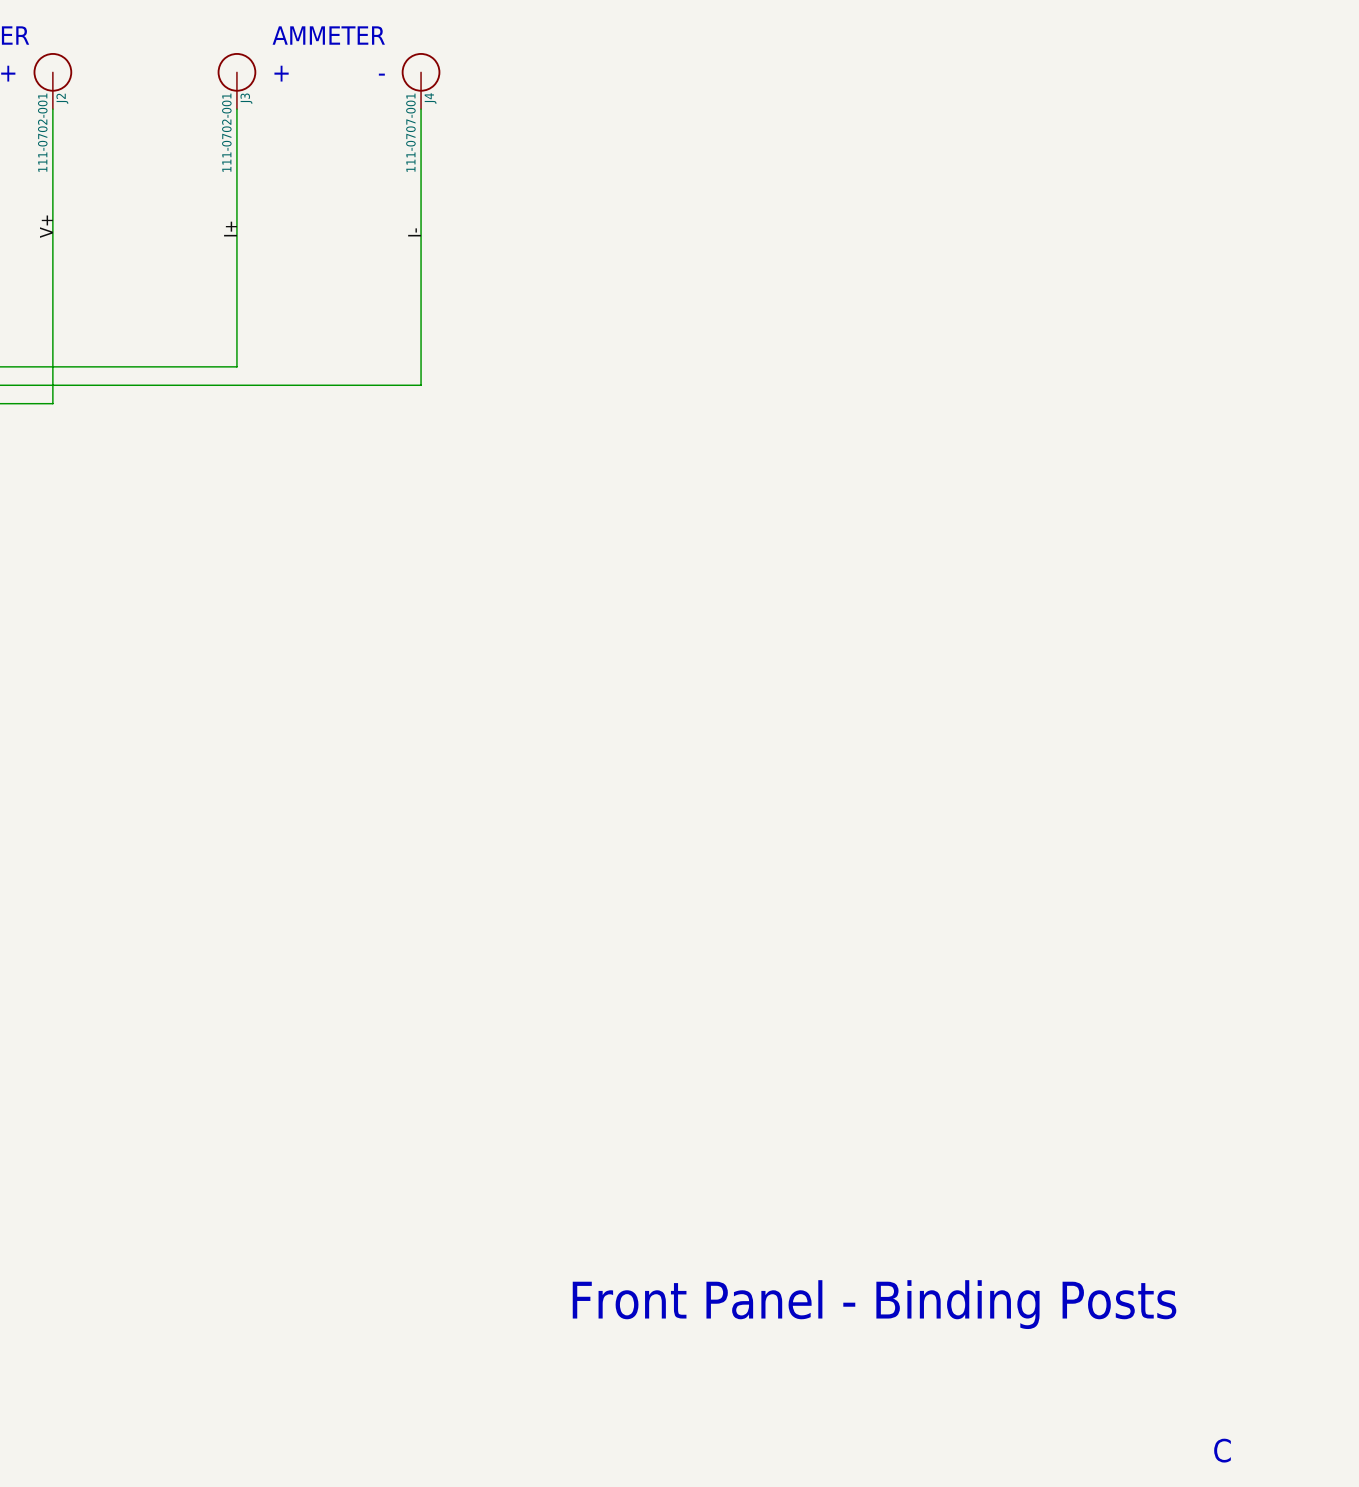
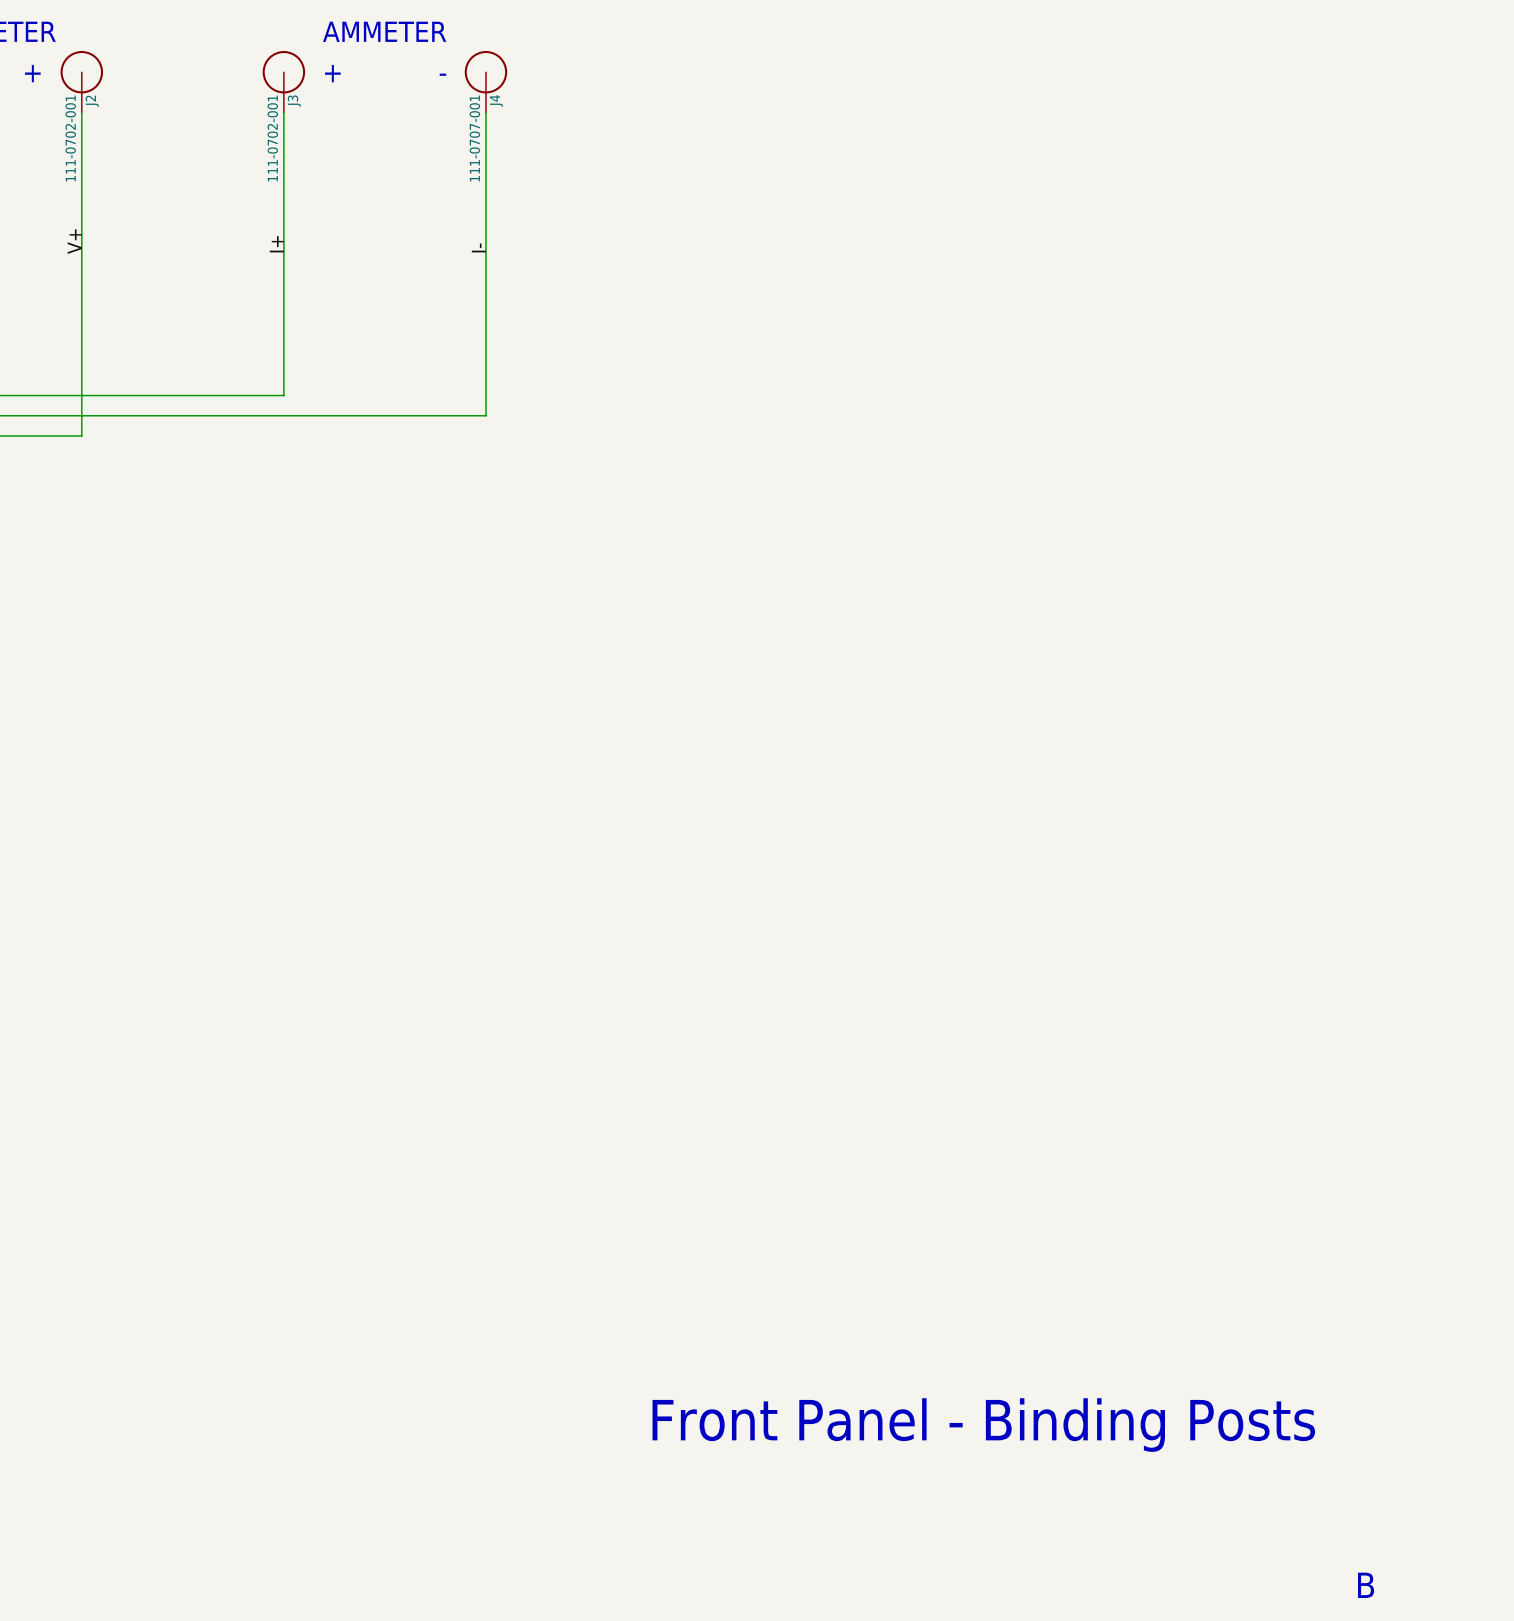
text: C (1222, 1450) -> B (1366, 1585)

